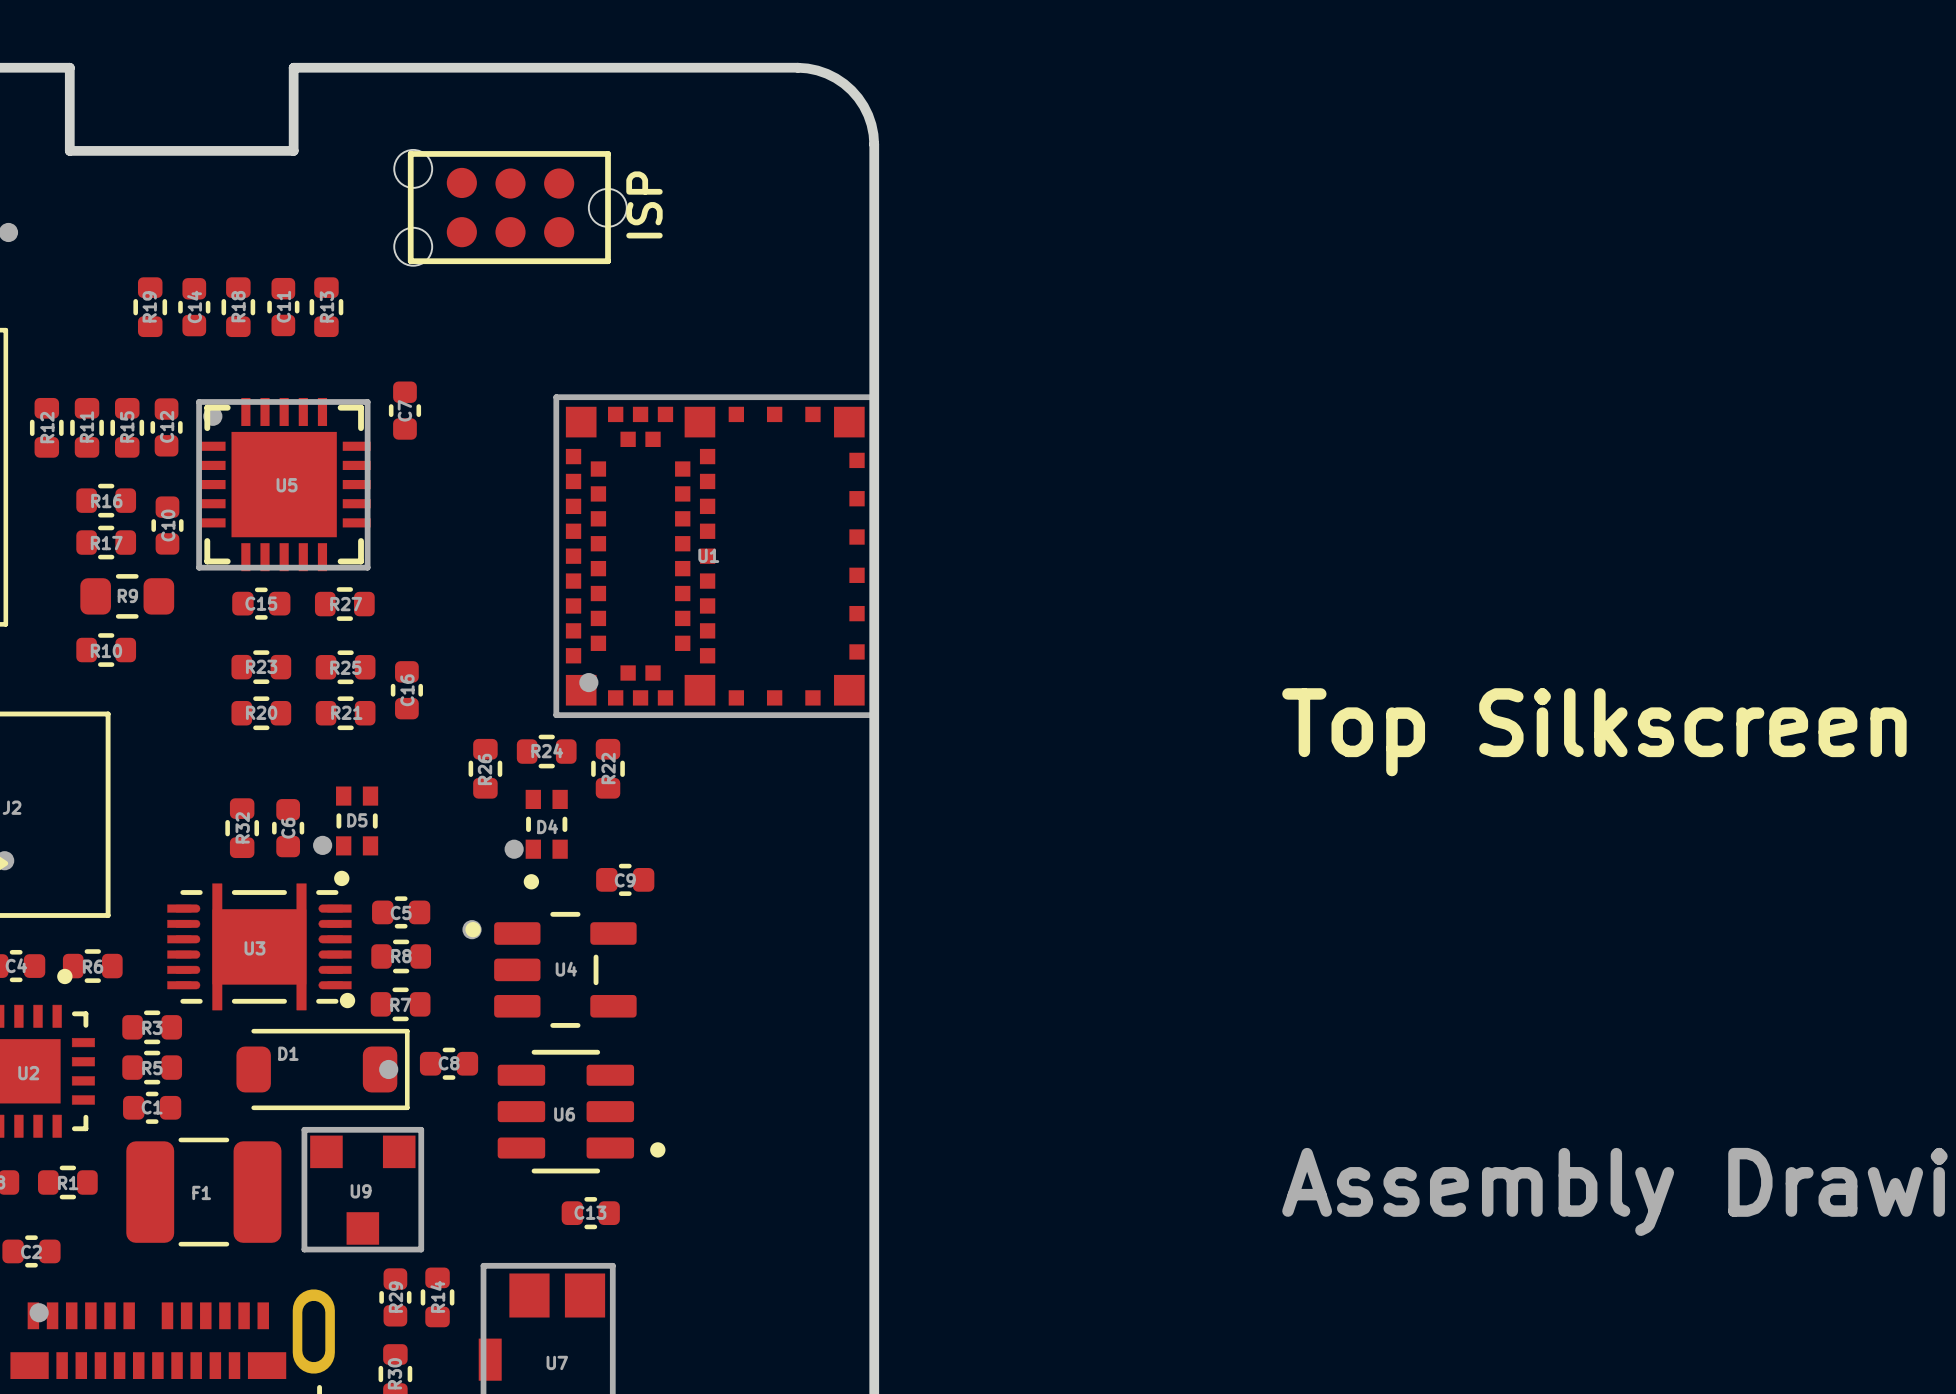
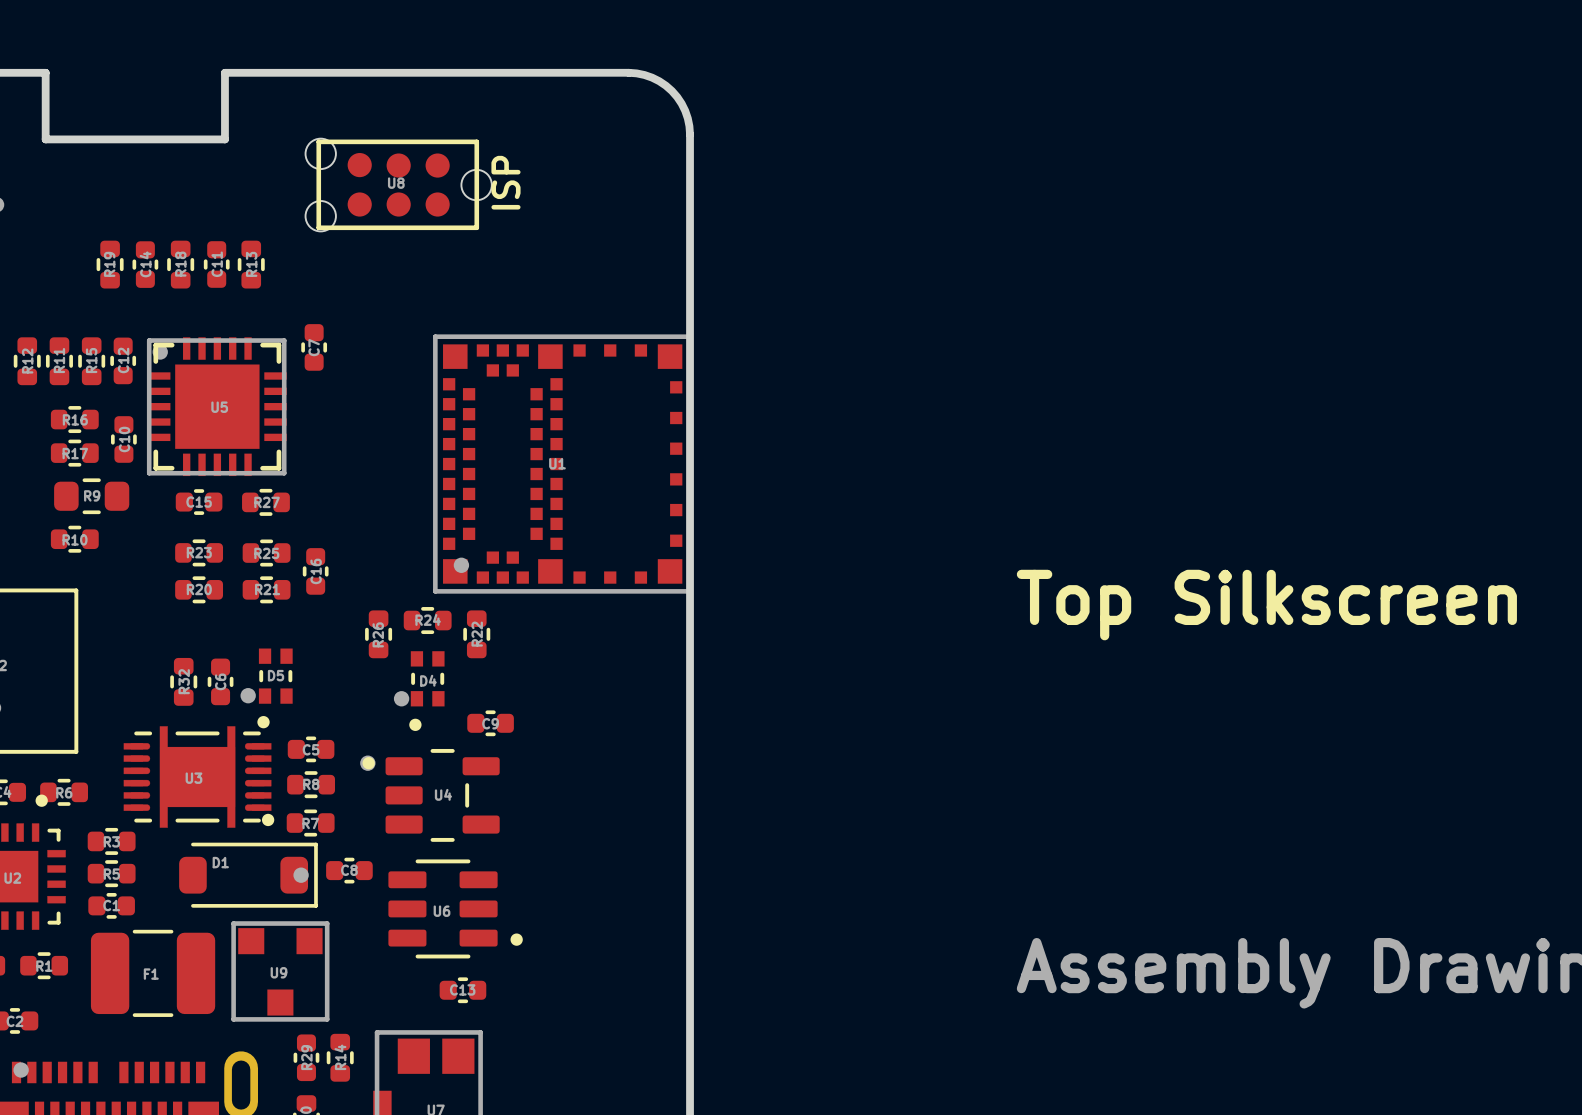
U8 name: none -> U8 (396, 183)

